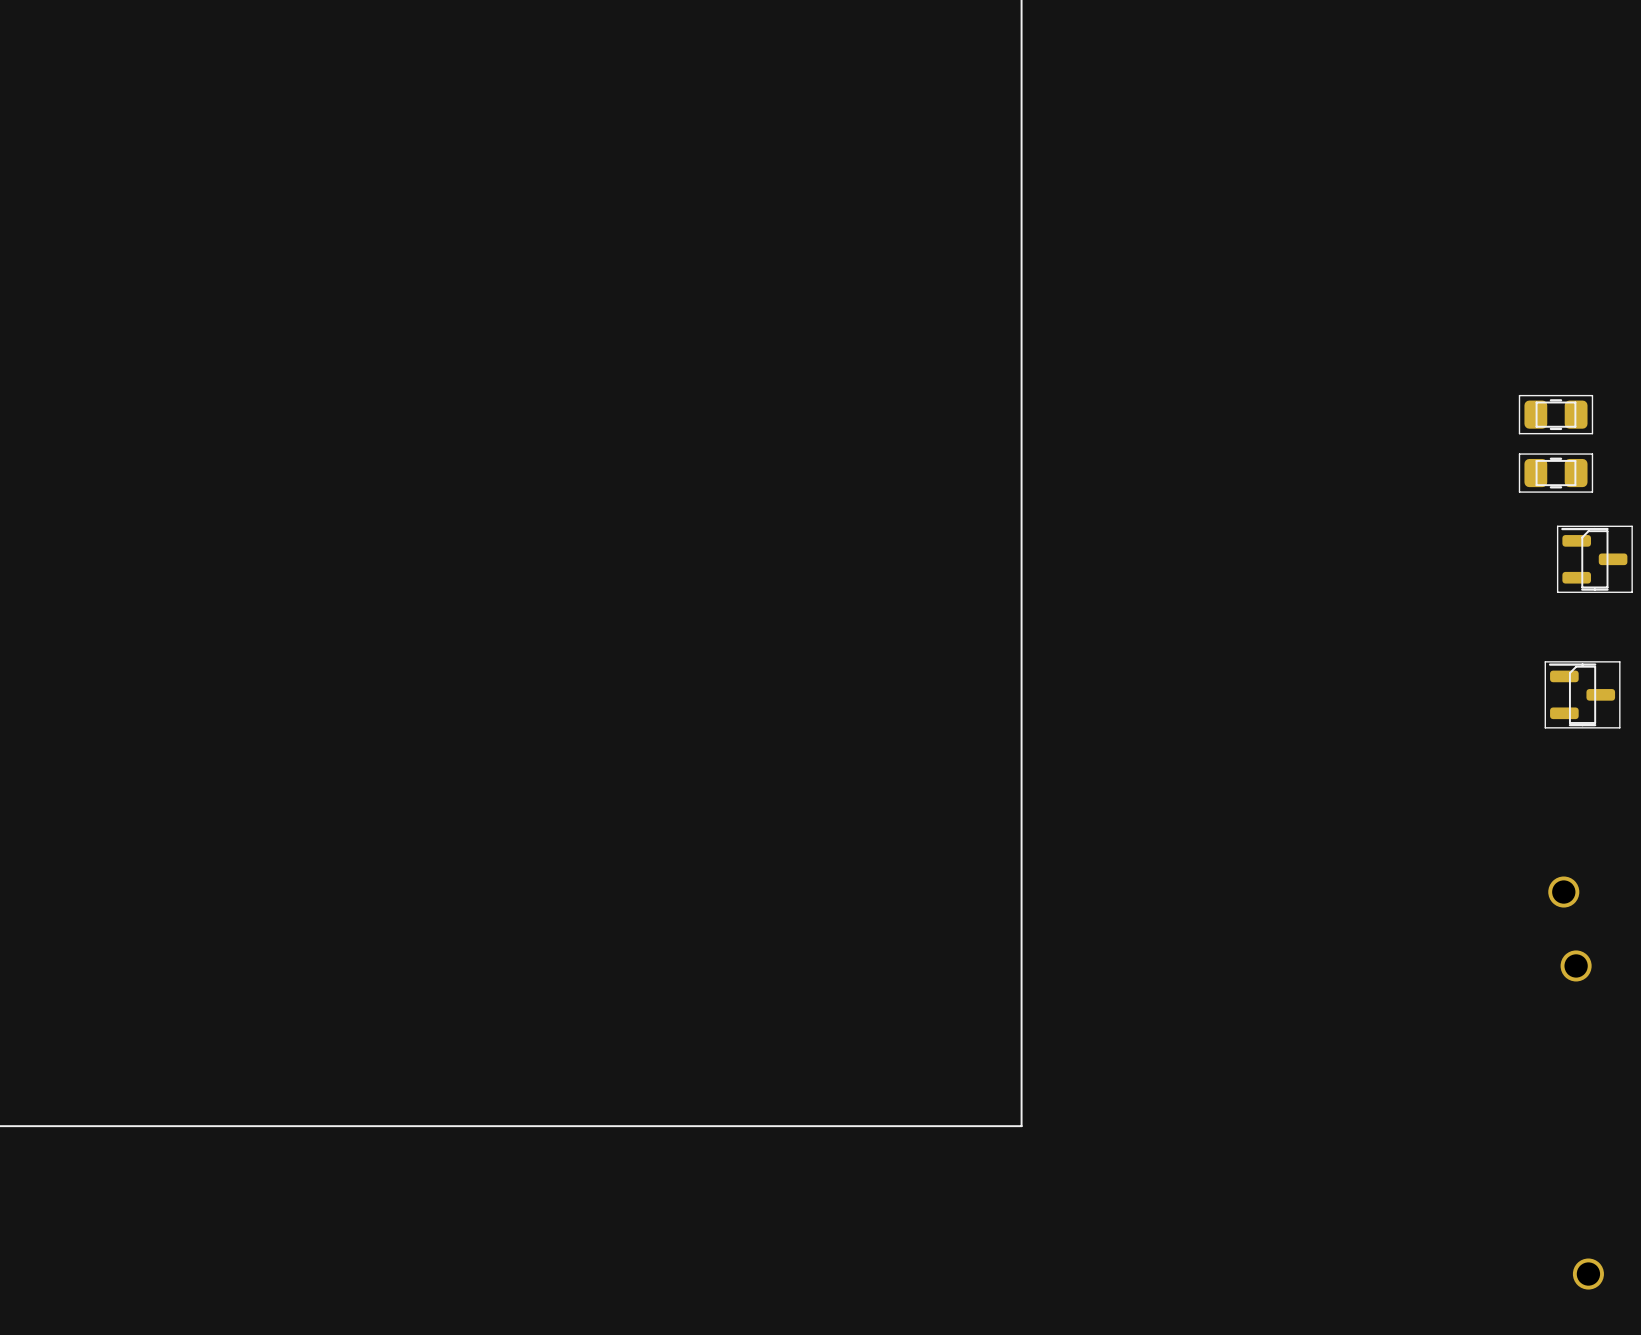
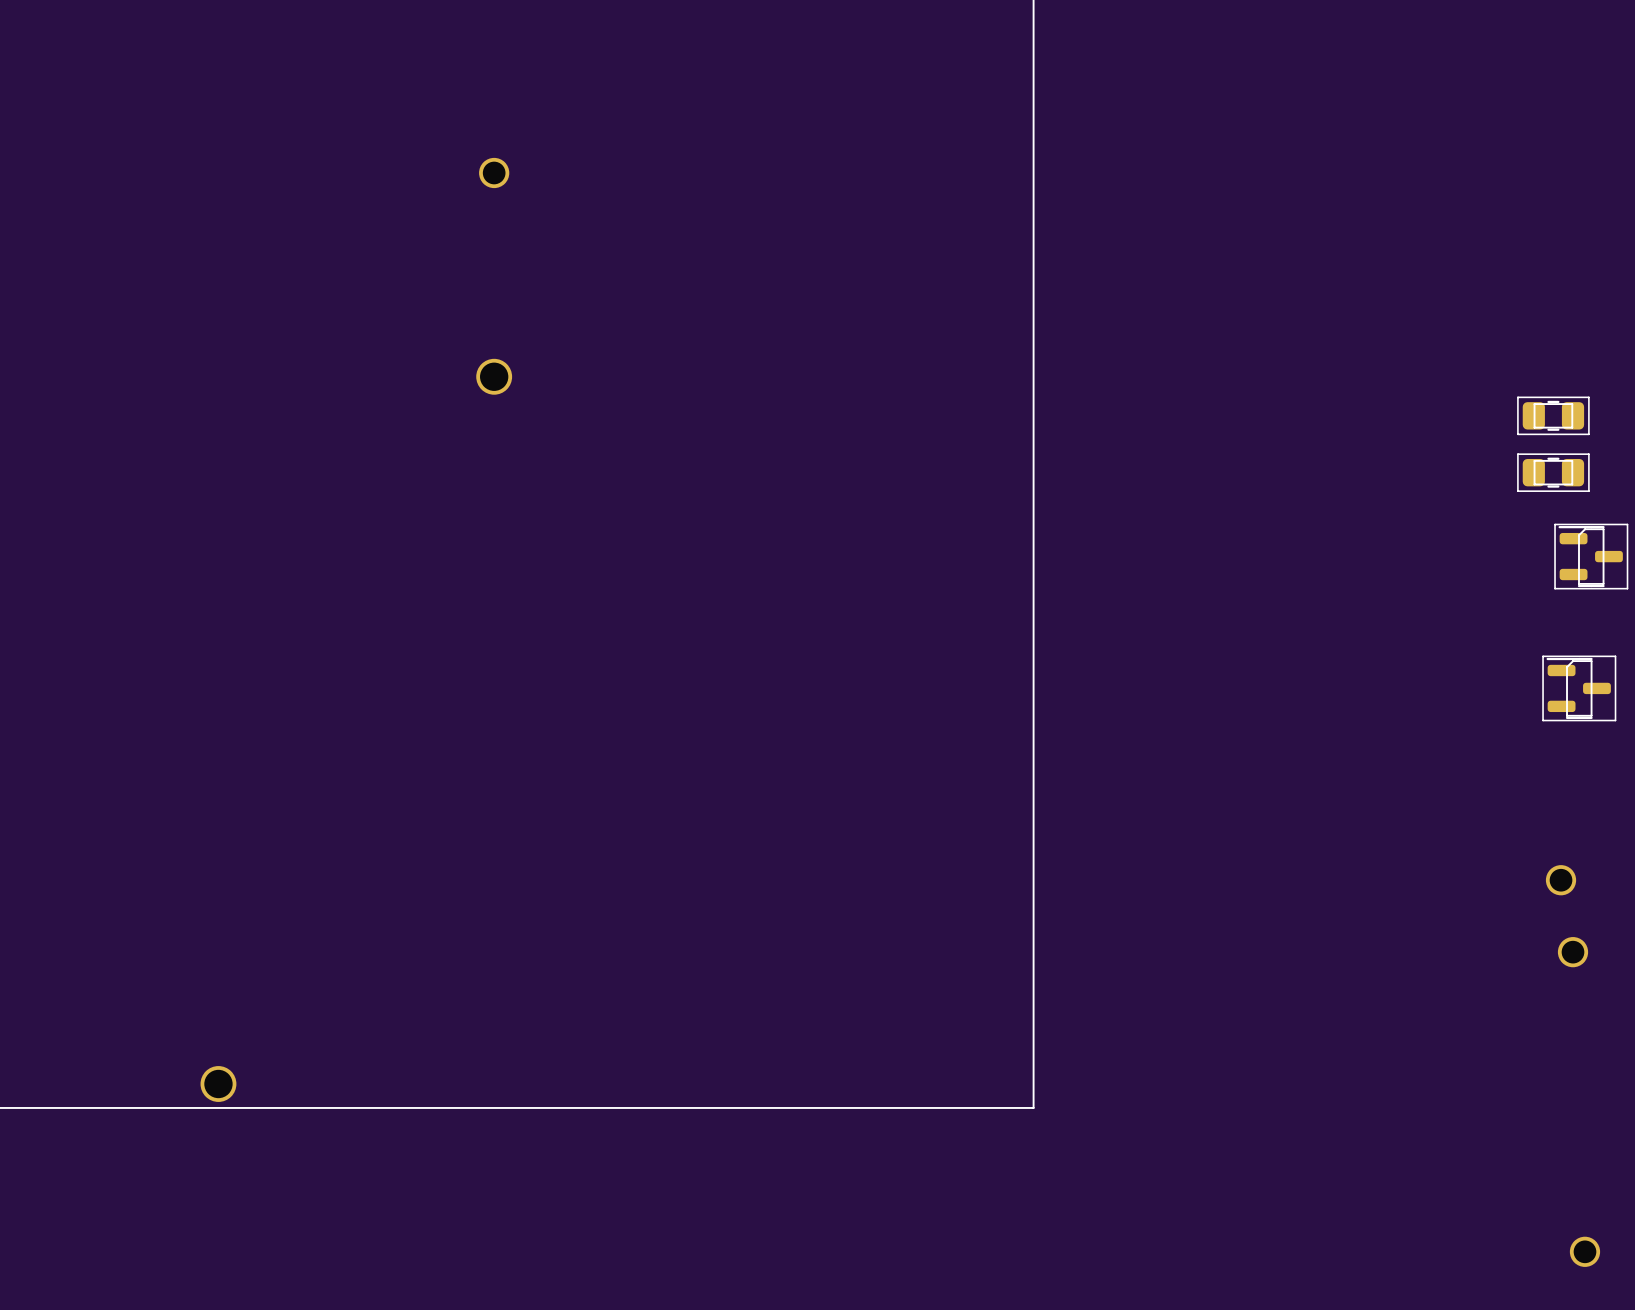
part: none -> (494, 172)
part: none -> (494, 376)
part: none -> (218, 1084)

